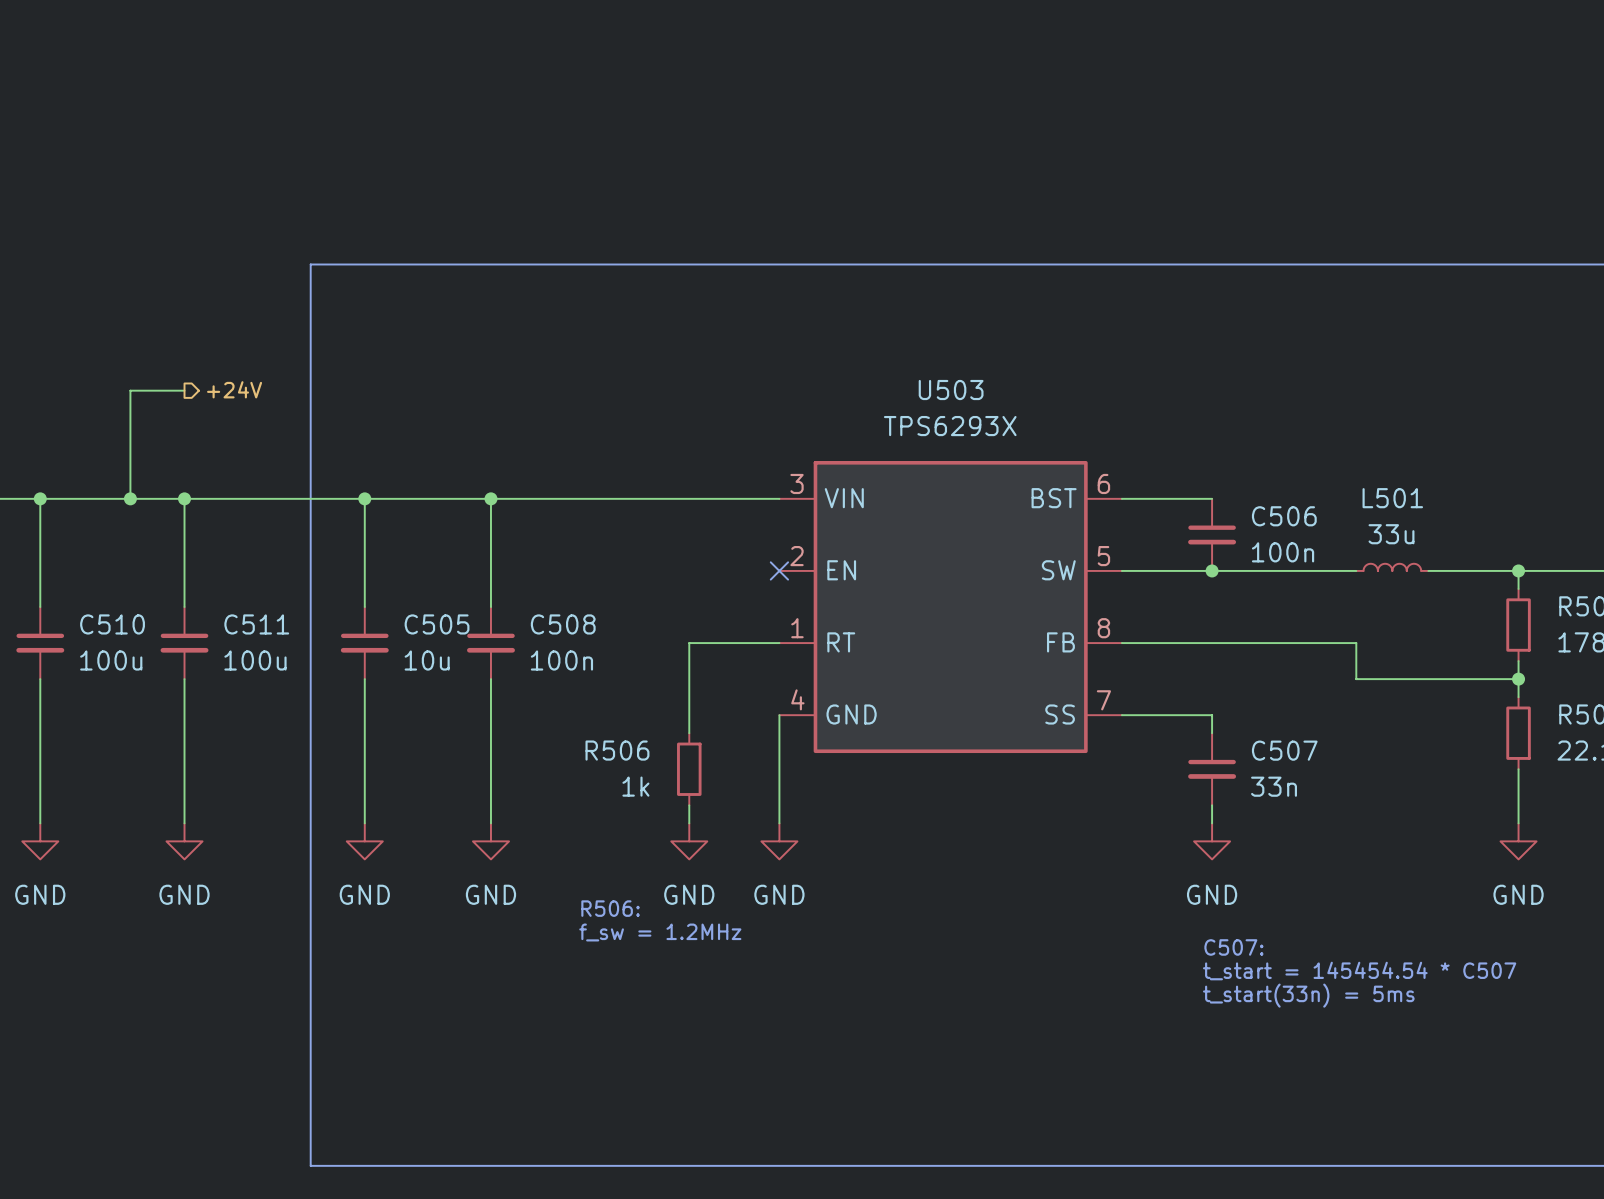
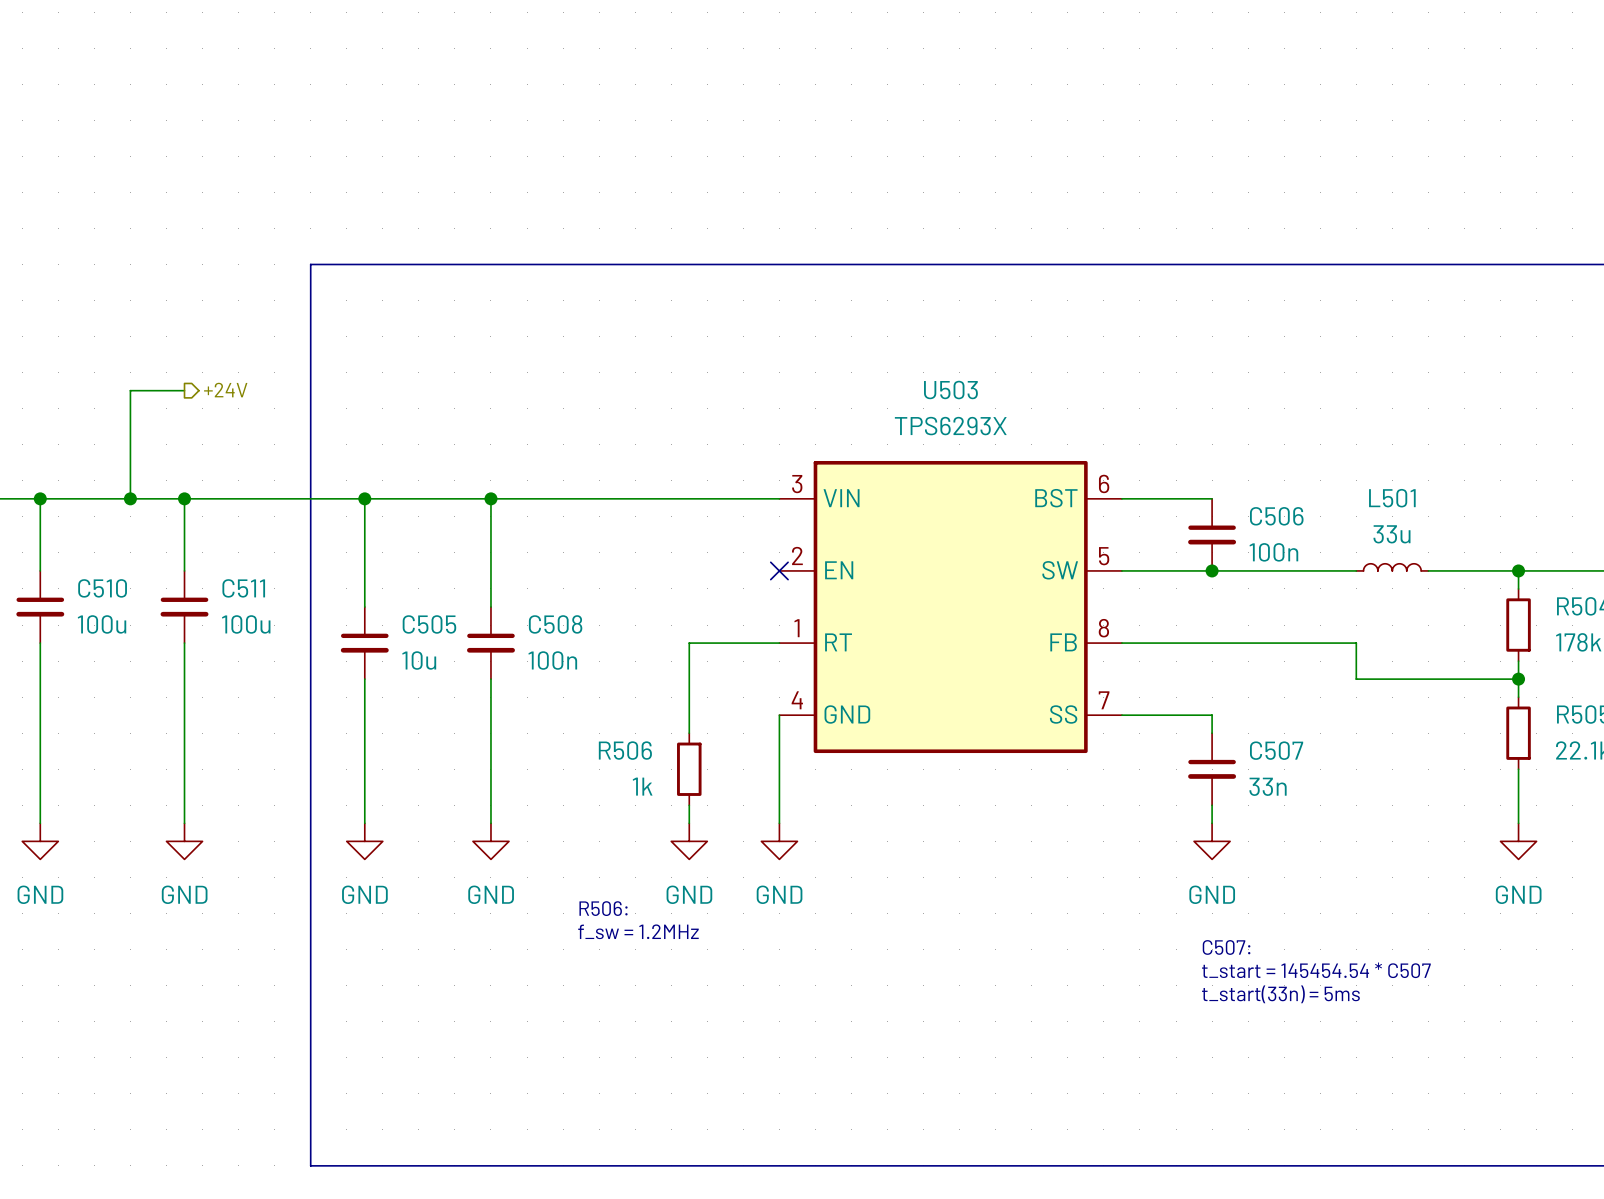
C510 position: (40, 643) -> (40, 607)
C511 position: (184, 643) -> (184, 607)

